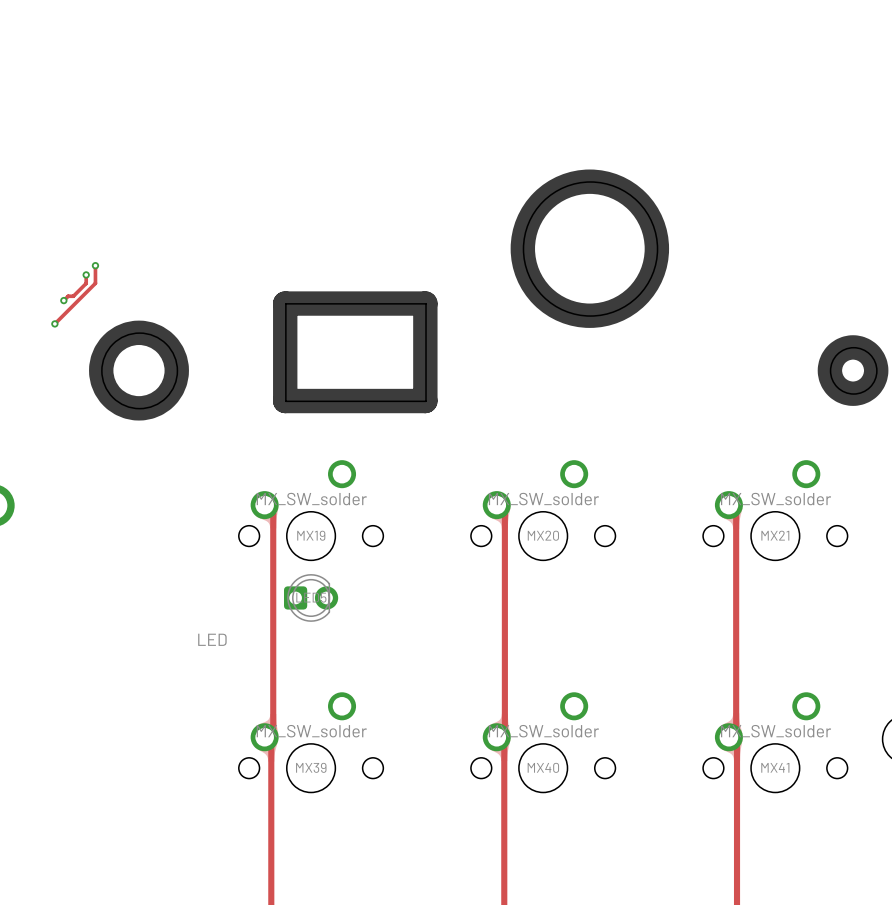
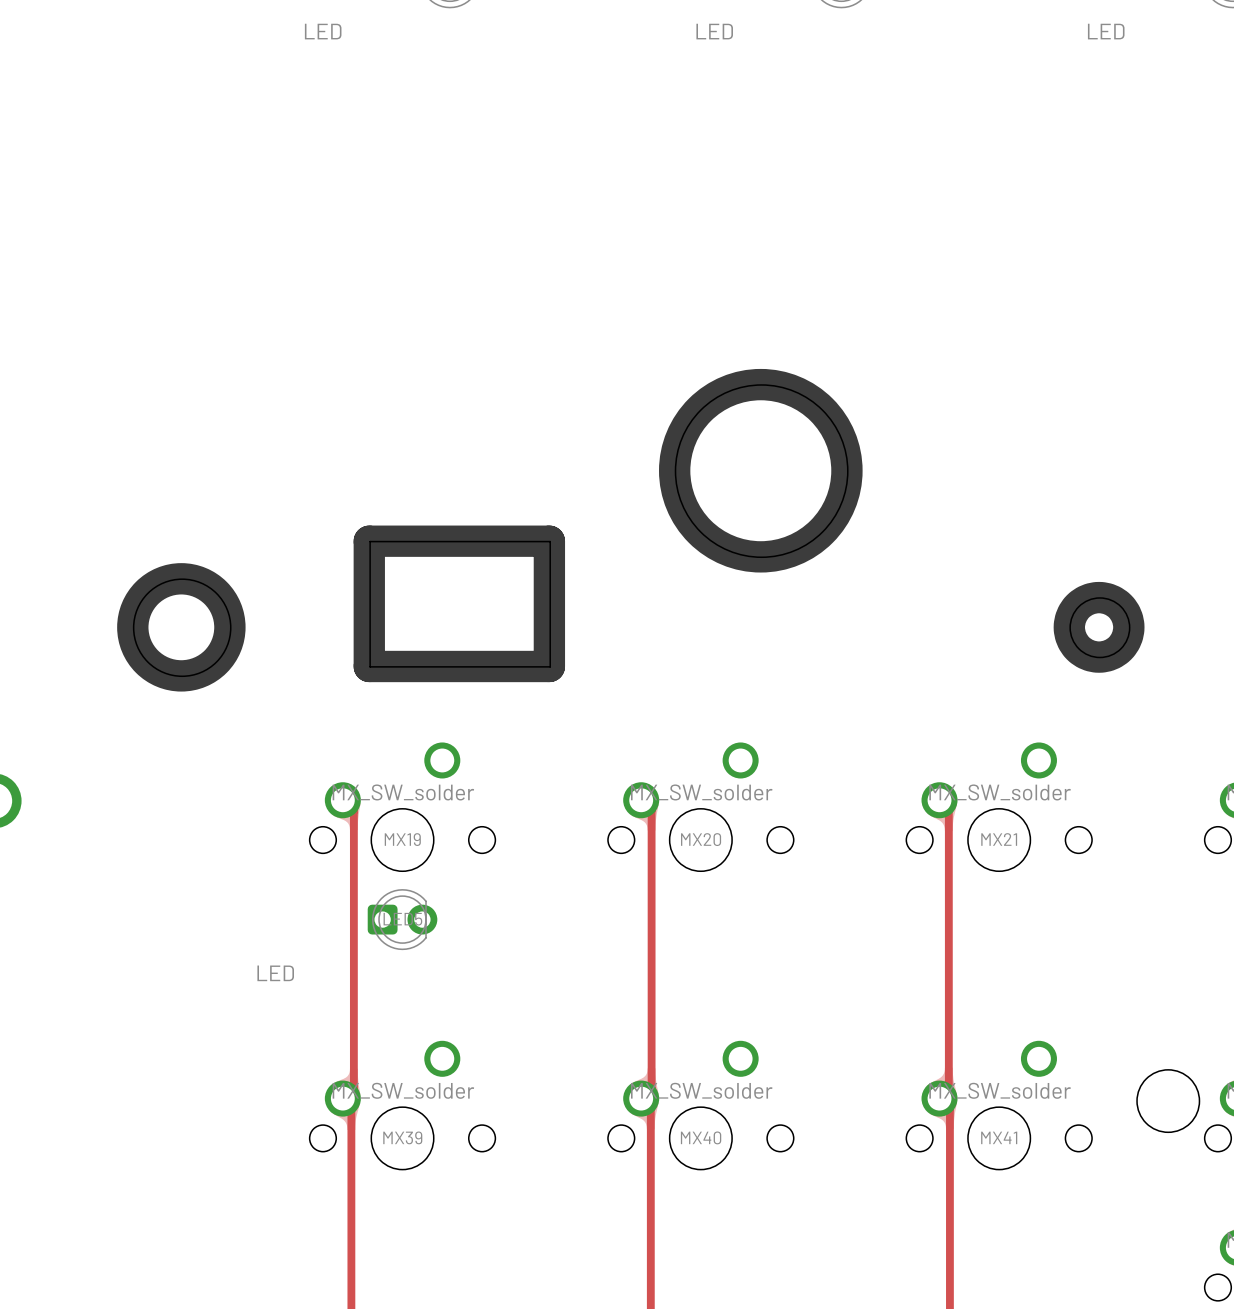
track: (95, 265) (95, 283) (54, 323) -> none
via: (95, 265) -> none
track: (86, 274) (86, 283) (73, 296) (68, 296) (63, 300) -> none
via: (86, 274) -> none
via: (63, 300) -> none
via: (54, 323) -> none

